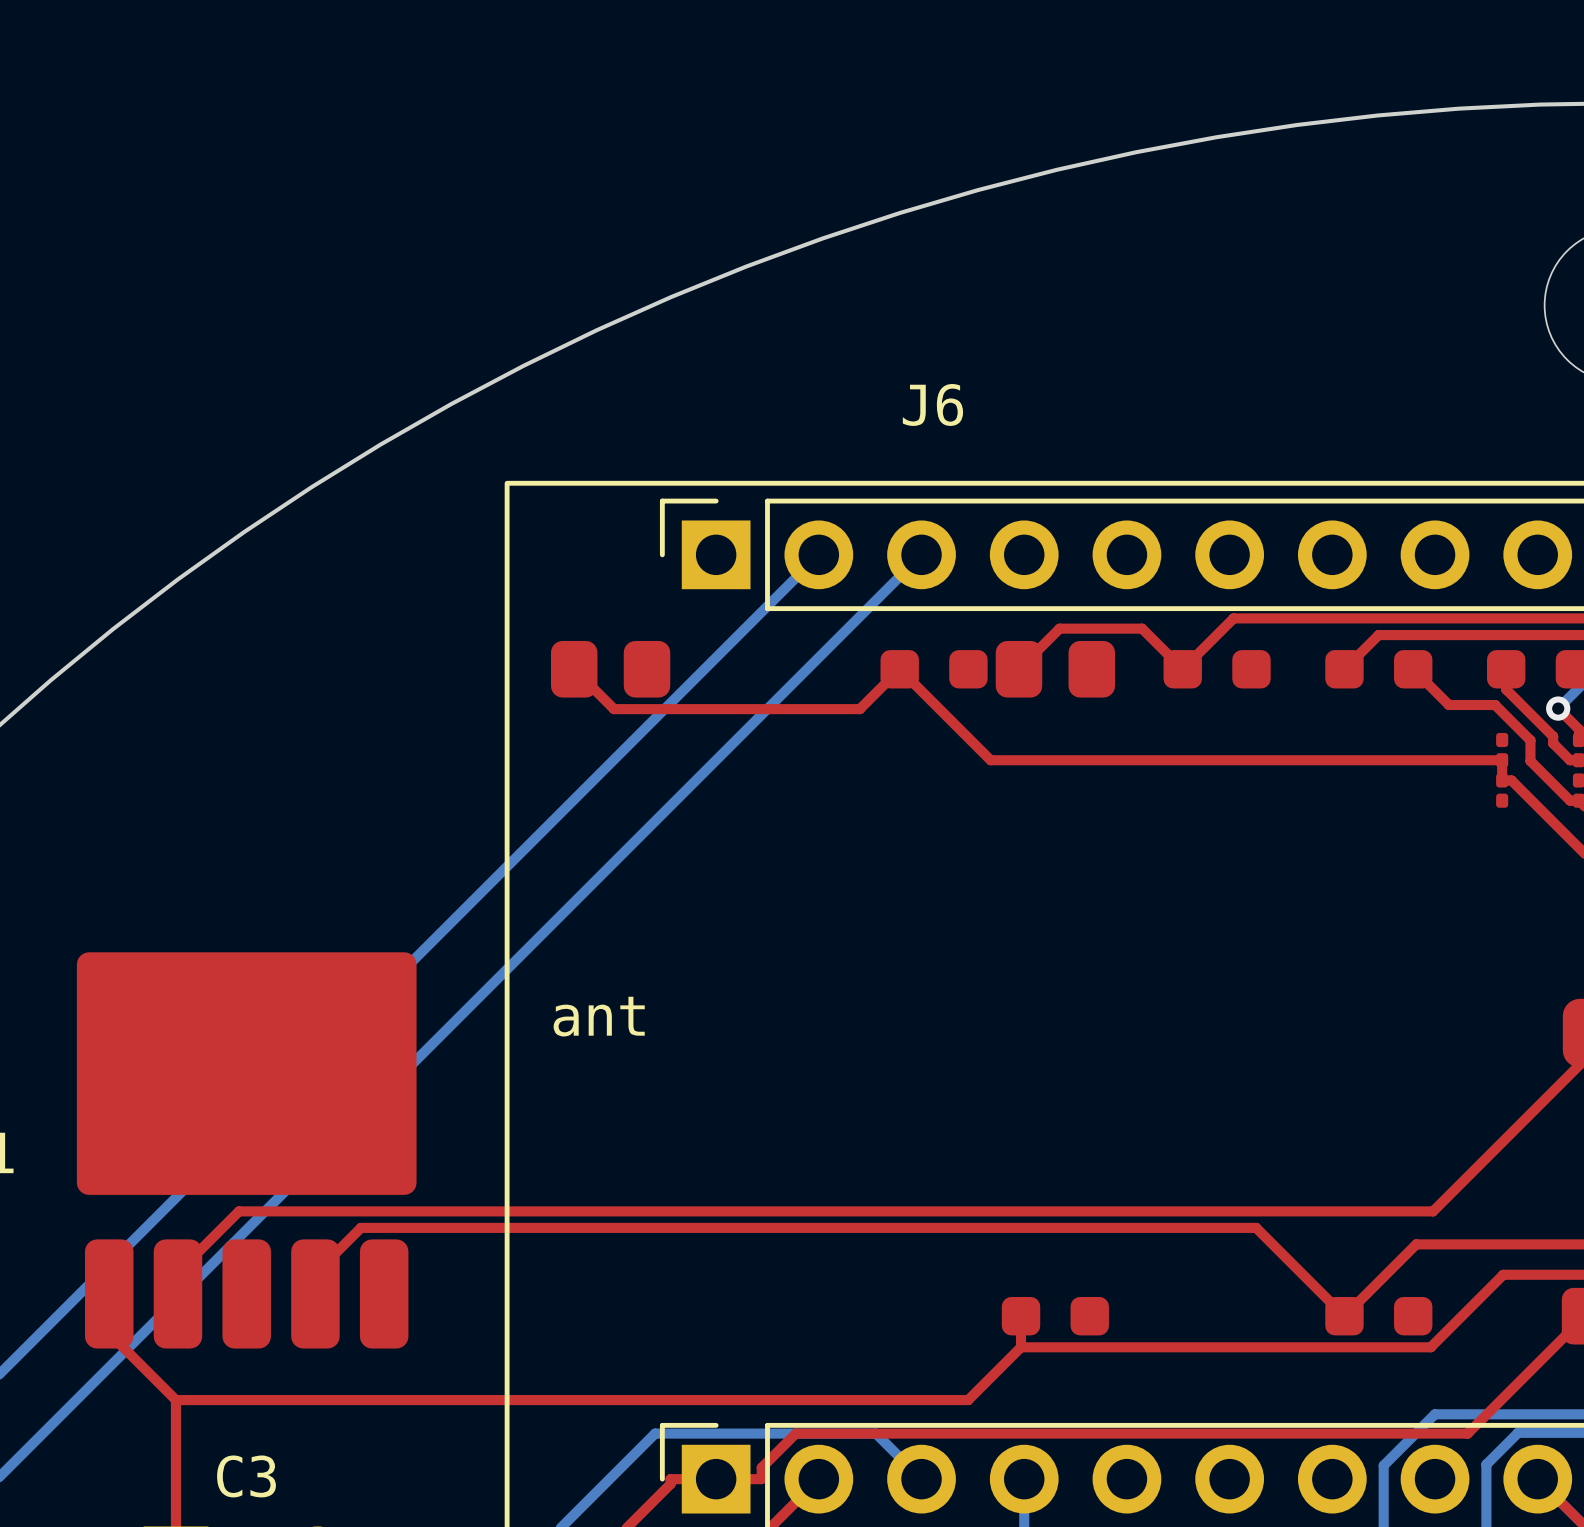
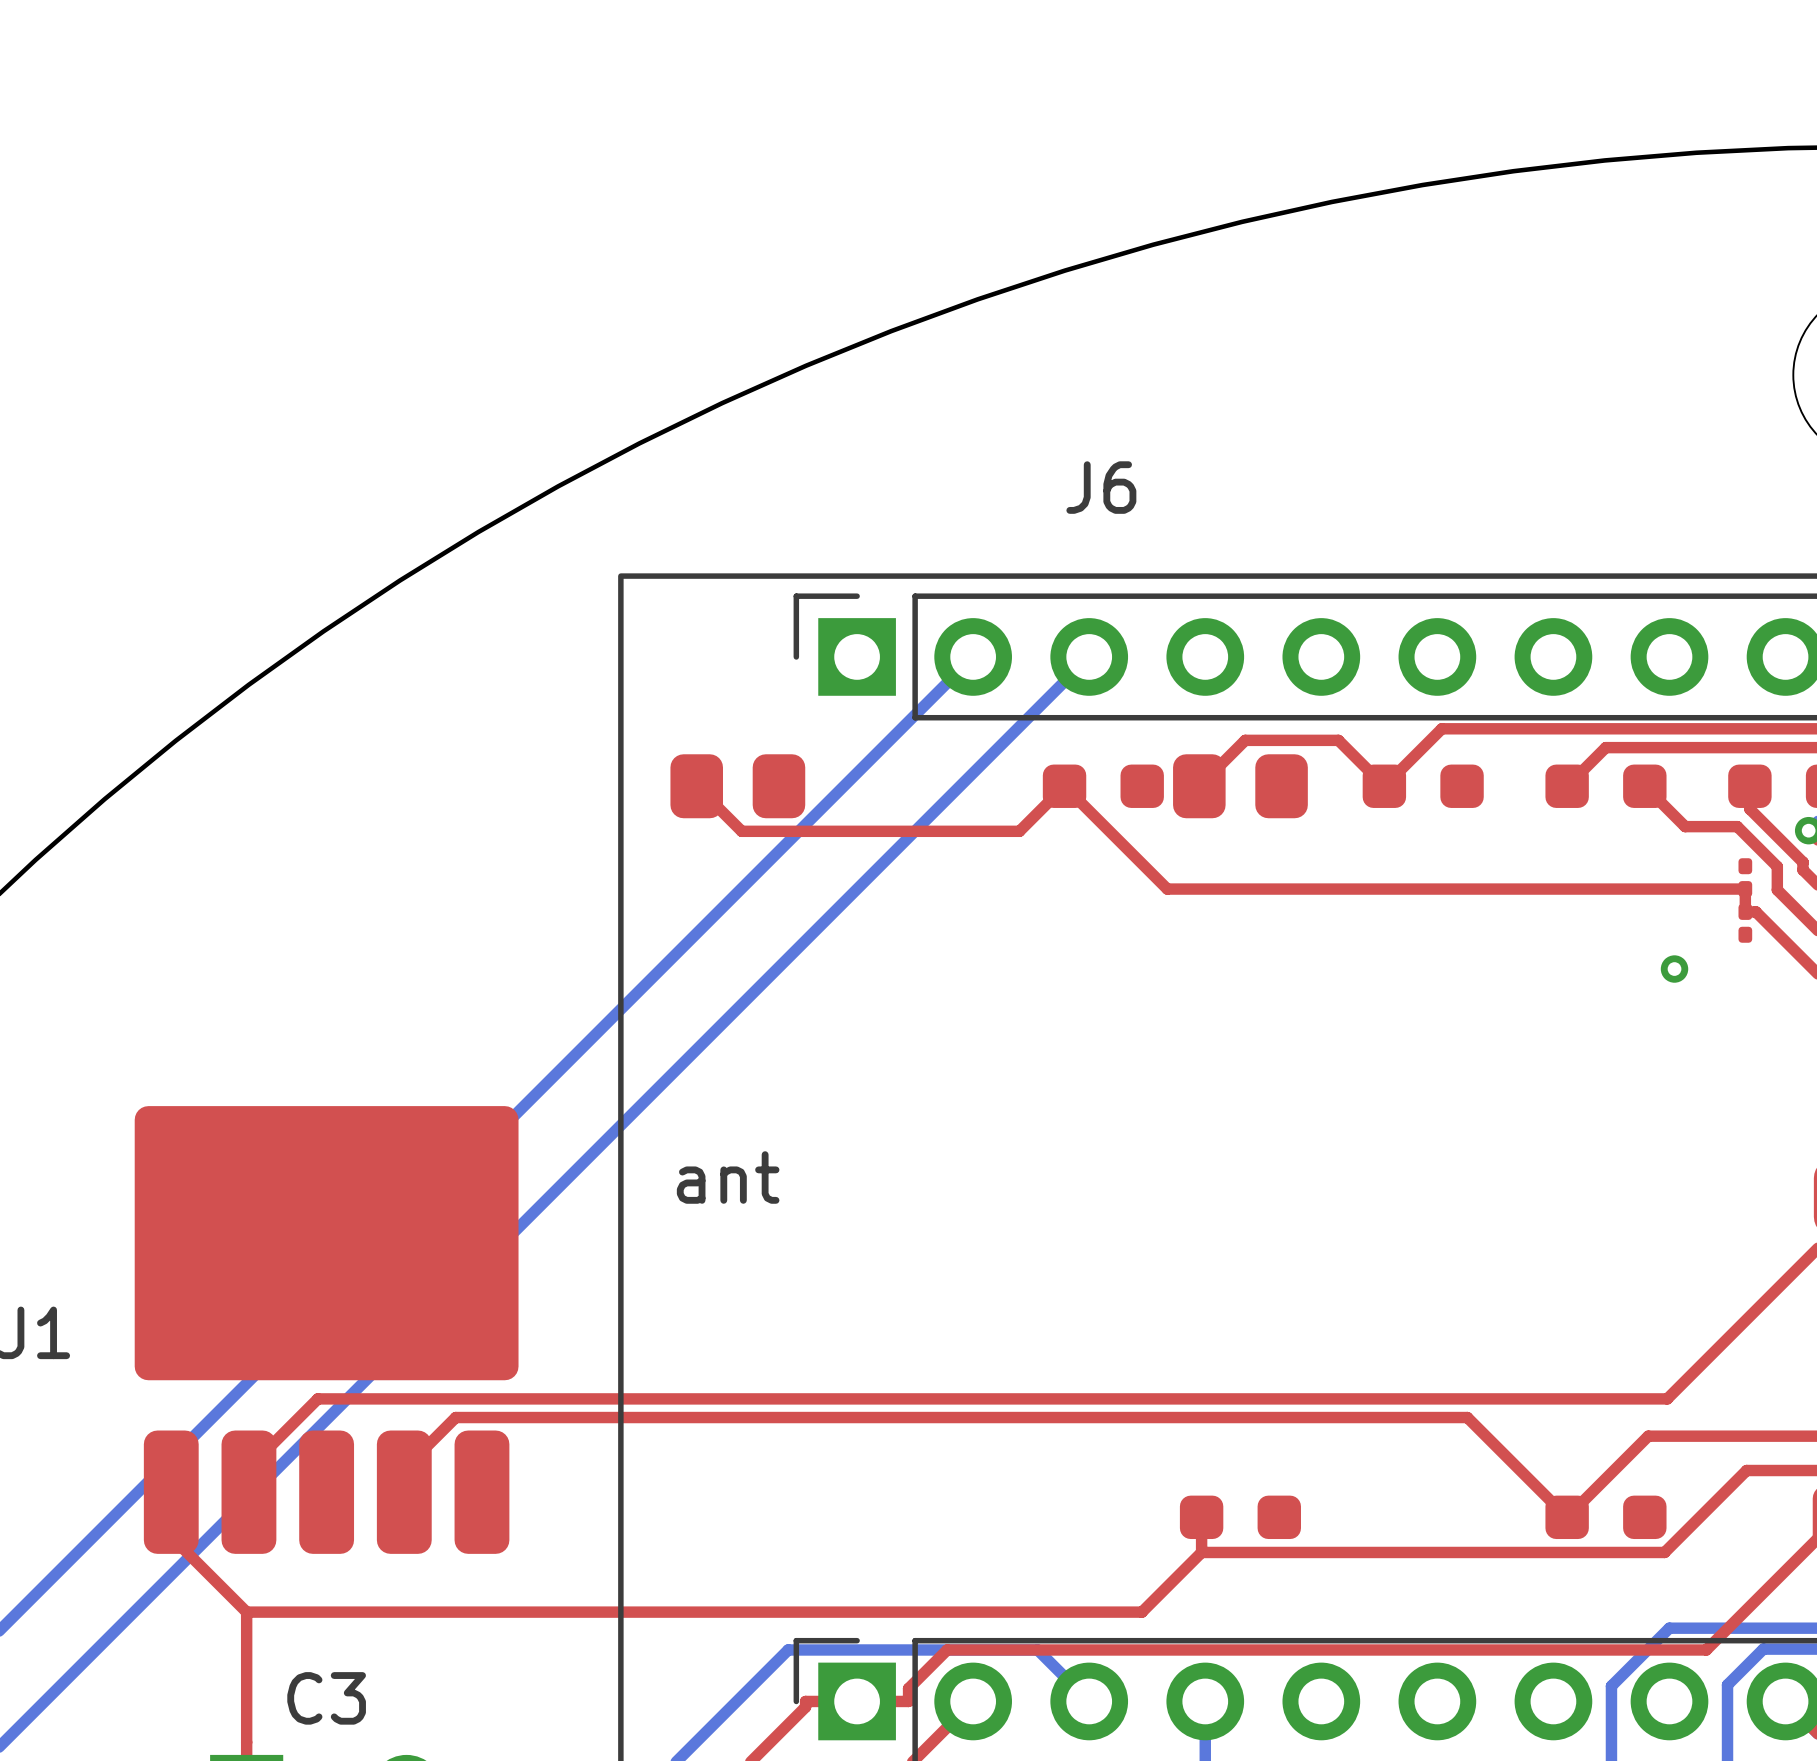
via: none -> (1674, 969)

